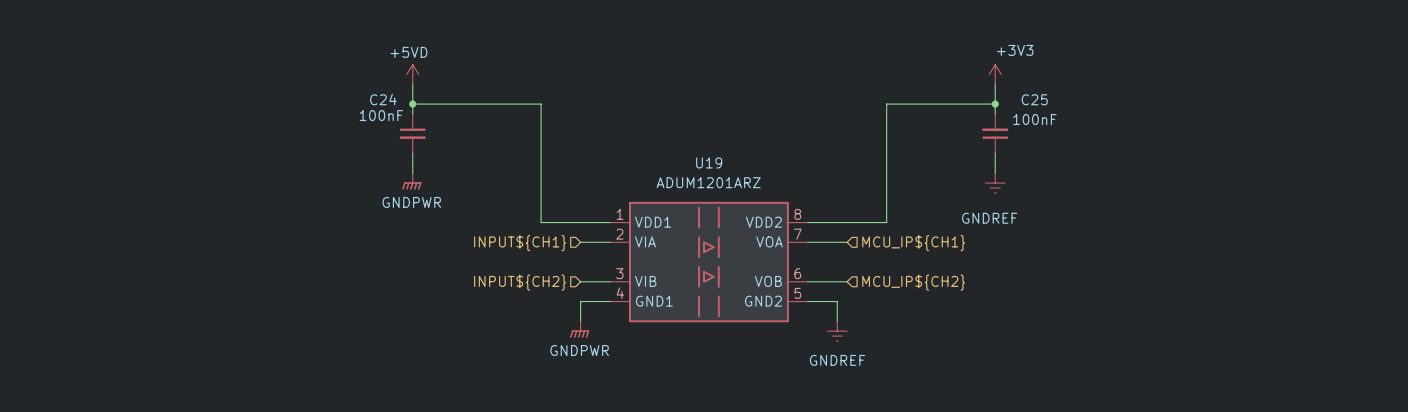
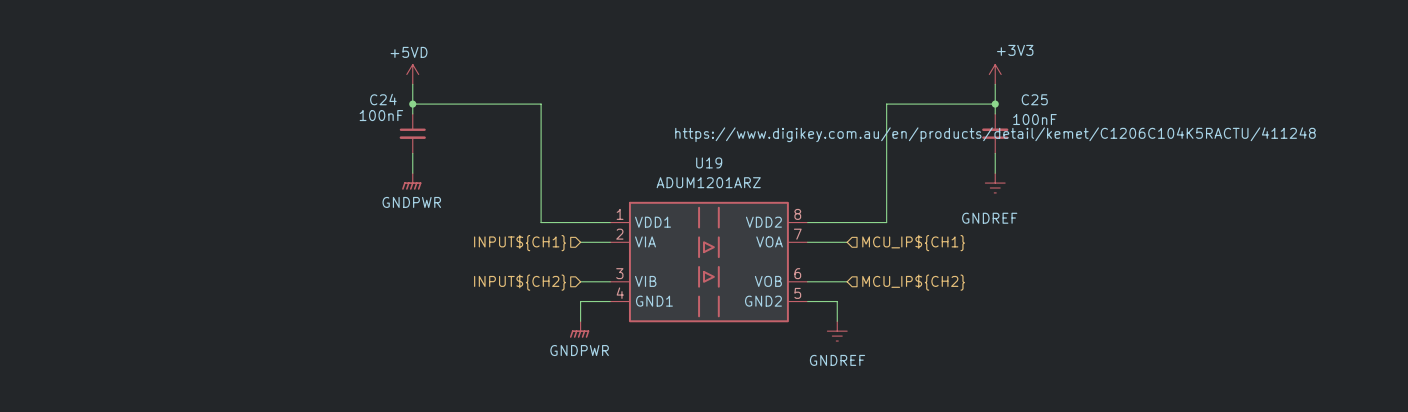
C25 text: none -> https://www.digikey.com.au/en/products/detail/kemet/C1206C104K5RACTU/411248 (995, 134)

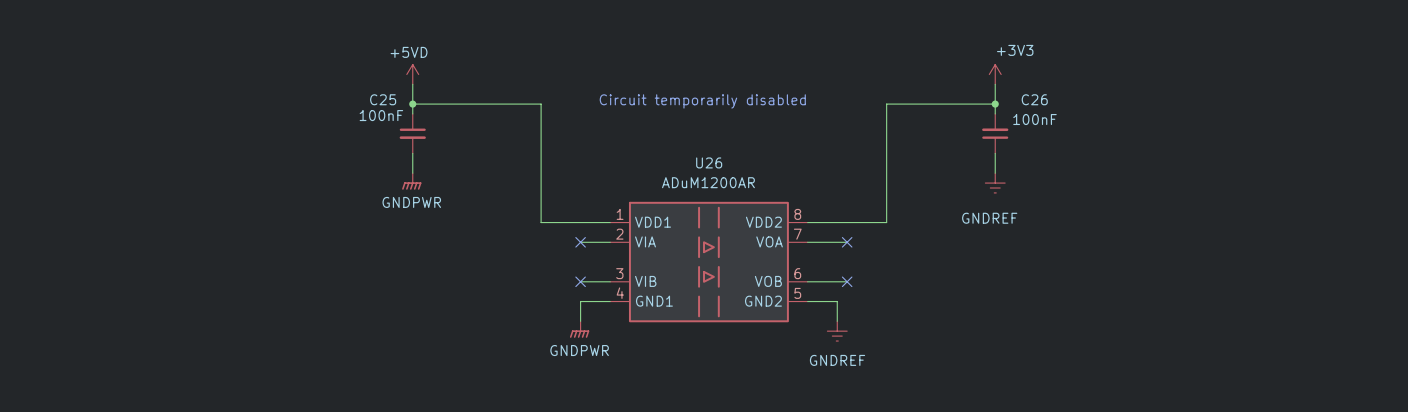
C24 name: C24 (383, 99) -> C25 (383, 99)
C25 name: C25 (1034, 99) -> C26 (1034, 99)
text: none -> Circuit temporarily disabled (702, 101)
C25 text: https://www.digikey.com.au/en/products/detail/kemet/C1206C104K5RACTU/411248 (995, 134) -> none
U19 name: U19 (709, 162) -> U26 (709, 162)
U19 value: ADUM1201ARZ (708, 182) -> ADuM1200AR (708, 182)
no-connect mark: none -> (580, 242)
no-connect mark: none -> (847, 242)
hierarchical label: INPUT${CH1} (520, 243) -> none
hierarchical label: MCU_IP${CH1} (913, 243) -> none
no-connect mark: none -> (580, 281)
no-connect mark: none -> (847, 281)
hierarchical label: INPUT${CH2} (520, 282) -> none
hierarchical label: MCU_IP${CH2} (913, 282) -> none

